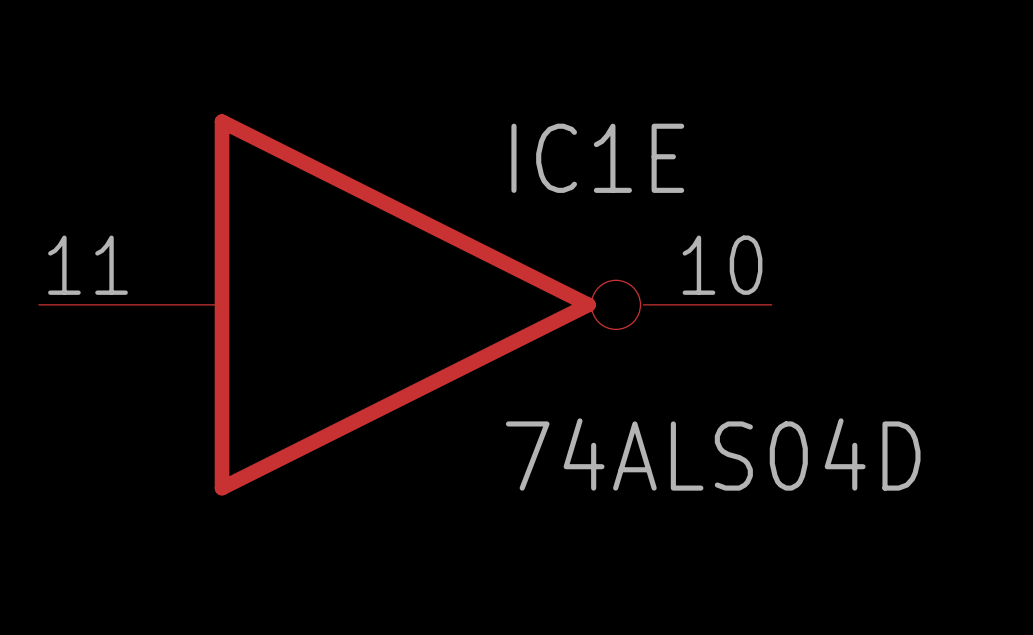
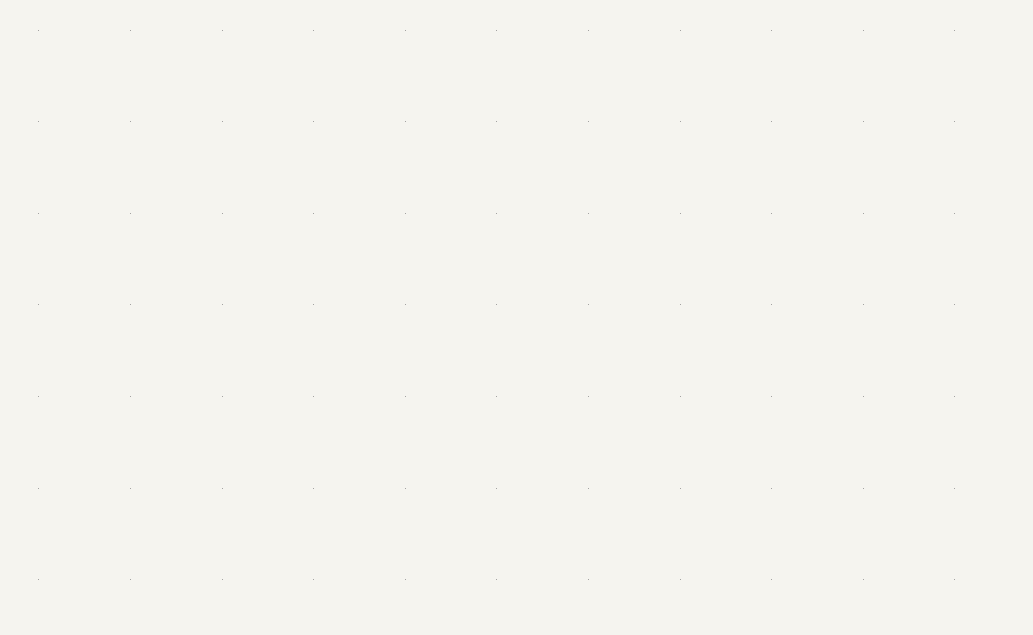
IC1E: 74ALS04D (405, 304) -> none

